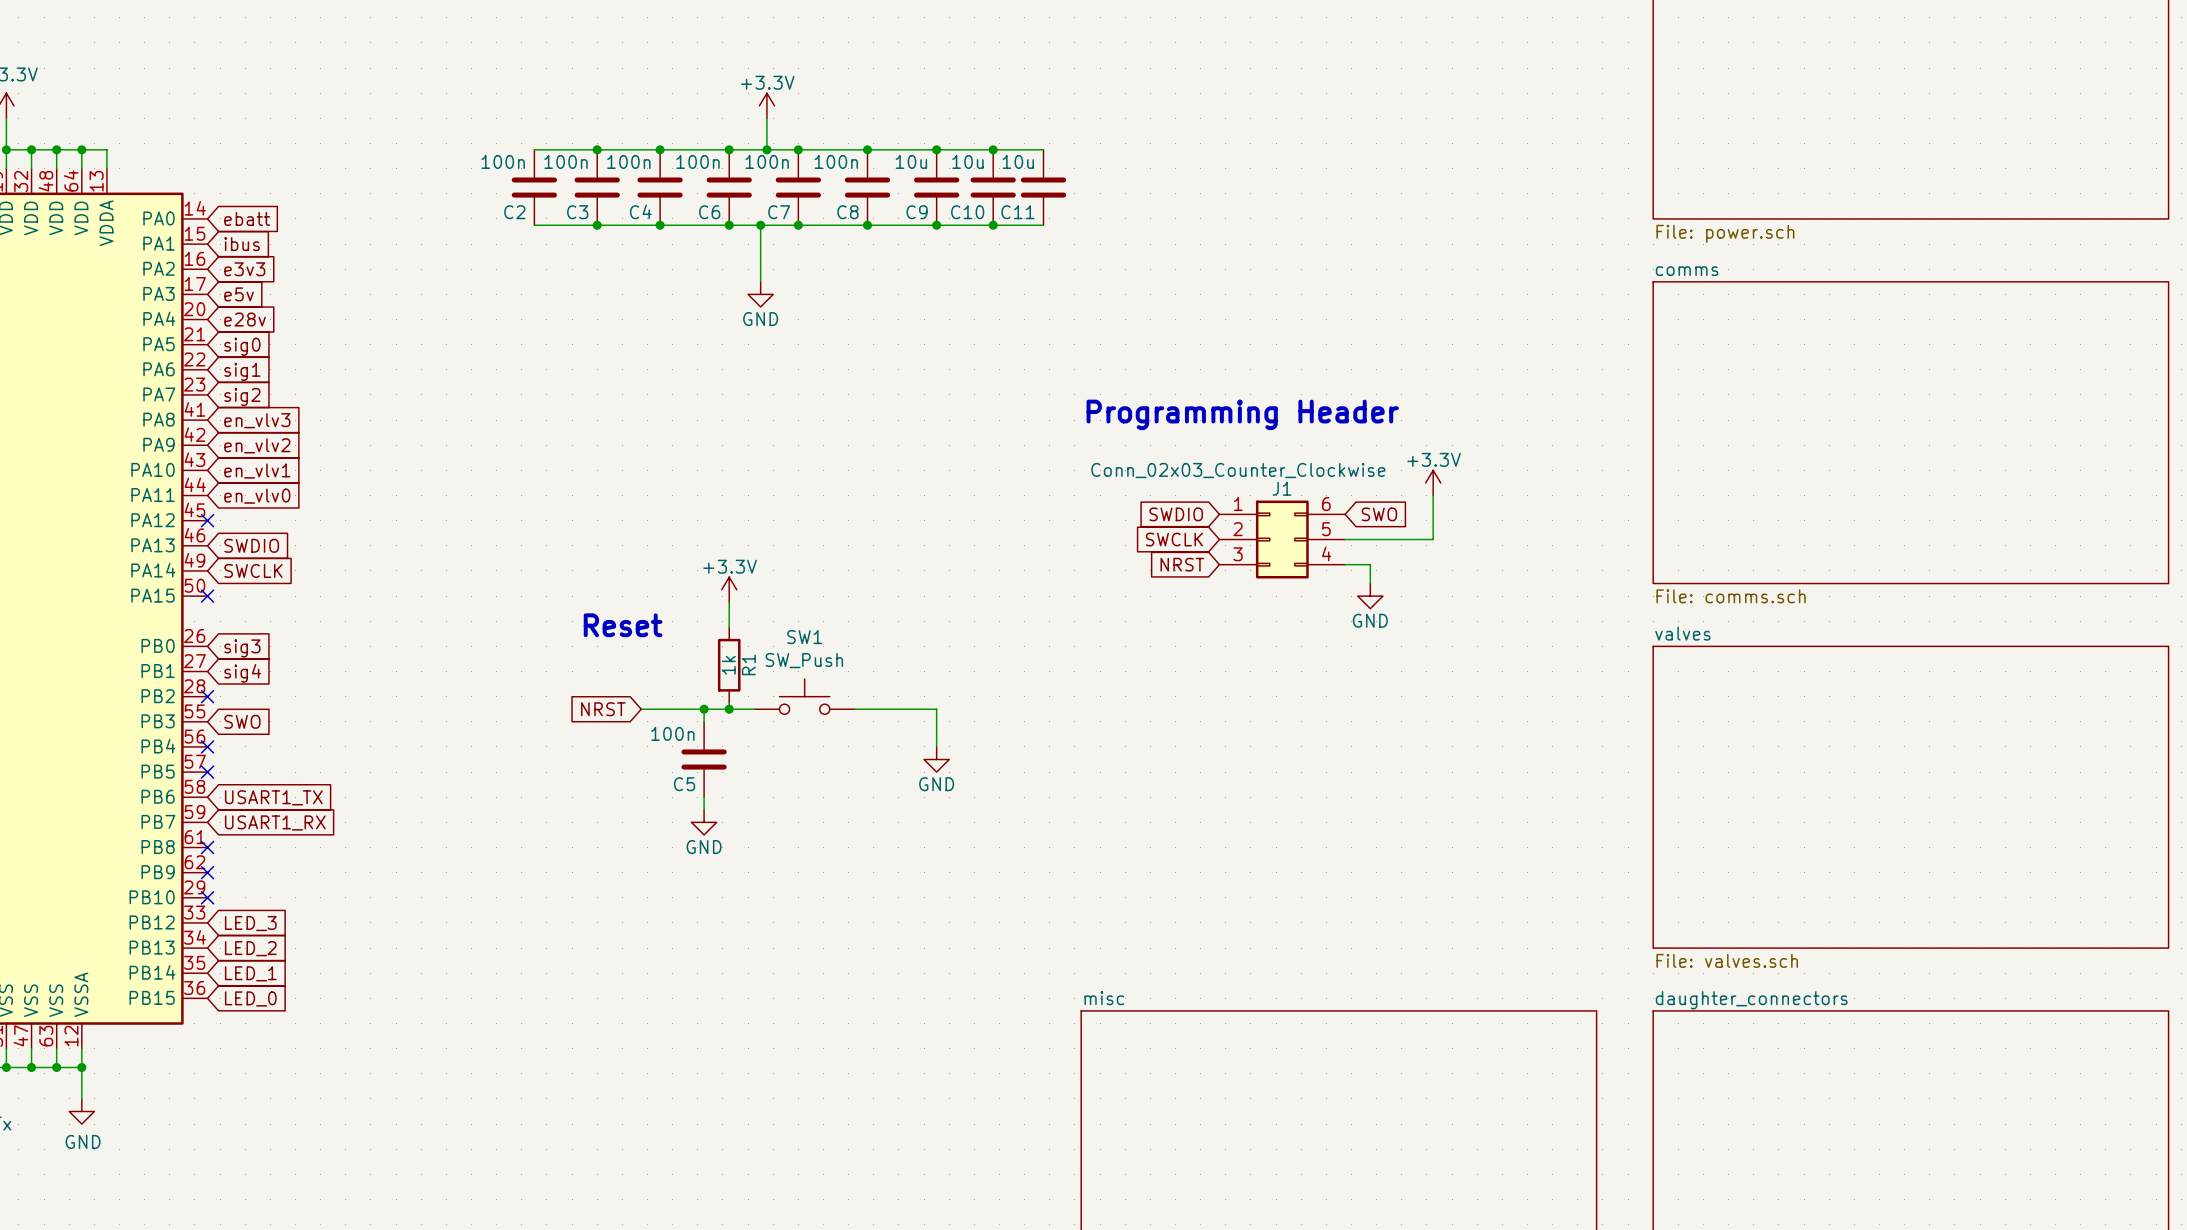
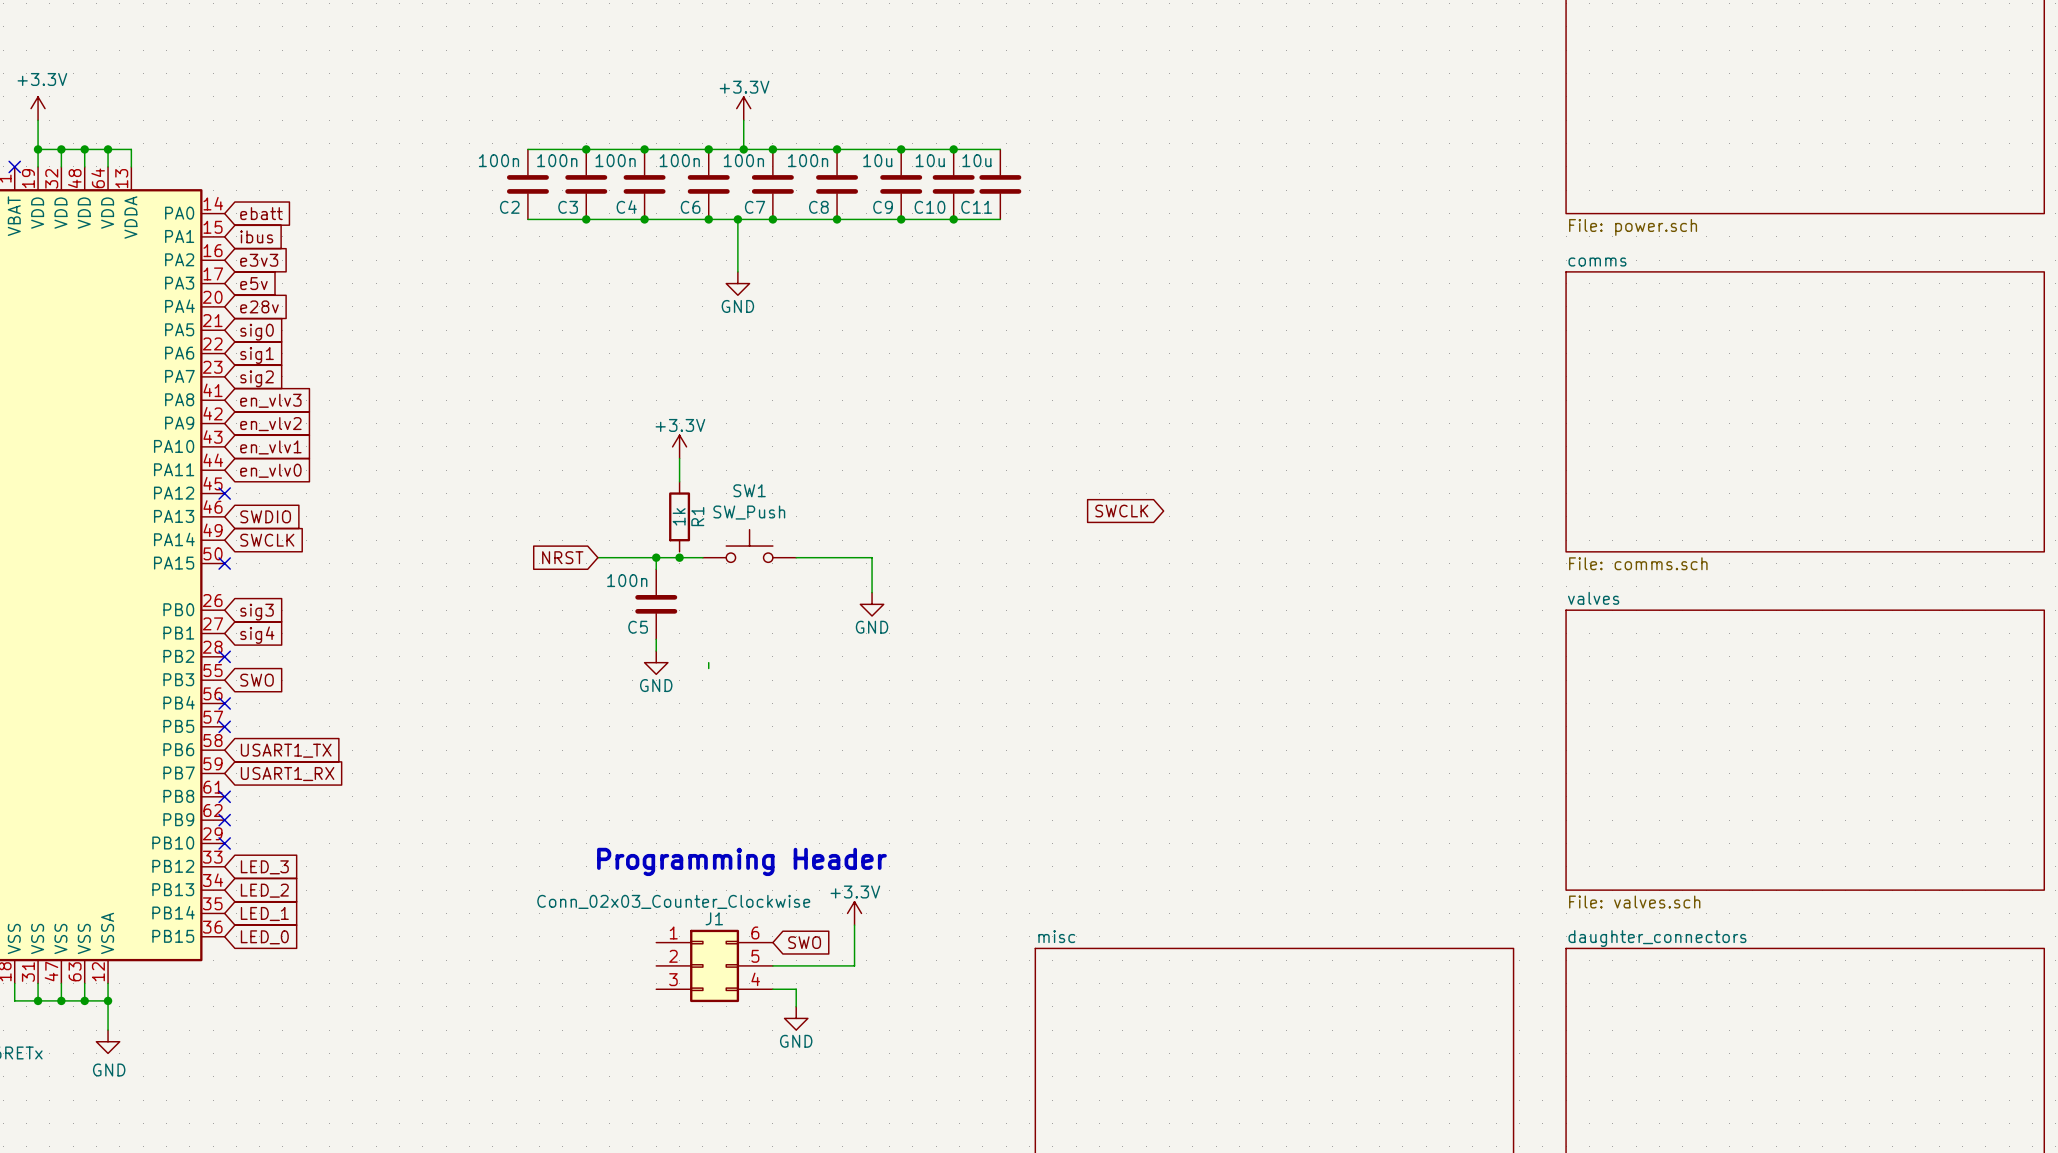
text: Programming Header (1242, 414) -> none
power symbol: +3.3V (1433, 482) -> none
wire: (1433, 495) (1433, 539) (1345, 539) -> none
global label: SWDIO (1176, 514) -> none
global label: SWO (1379, 514) -> none
J1 position: (1282, 539) -> (714, 965)
global label: NRST (1182, 564) -> none
wire: (1345, 564) (1370, 564) (1370, 583) -> none
junction: none -> (656, 557)
junction: none -> (679, 557)
power symbol position: +3.3V (729, 589) -> +3.3V (679, 446)
power symbol: GND (1370, 596) -> none
wire: (729, 602) (729, 627) -> (679, 458) (679, 481)
text: Reset (623, 625) -> none
R1 position: (729, 665) -> (679, 516)
SW1 position: (804, 696) -> (749, 546)
global label position: NRST (603, 709) -> NRST (562, 557)
wire: (641, 709) (754, 709) -> (597, 557) (702, 557)
wire: (704, 709) (704, 721) -> (656, 557) (656, 569)
junction: (704, 709) -> none
junction: (729, 709) -> none
wire: (854, 709) (936, 709) (936, 746) -> (796, 557) (872, 557) (872, 592)
C5 position: (704, 759) -> (656, 604)
power symbol position: GND (936, 759) -> GND (872, 604)
wire: (704, 797) (704, 809) -> (656, 639) (656, 651)
power symbol position: GND (704, 822) -> GND (656, 662)
text: none -> Programming Header (741, 861)
power symbol: none -> +3.3V (854, 913)
wire: none -> (854, 925) (854, 965) (772, 965)
global label: none -> SWO (804, 942)
wire: none -> (772, 989) (796, 989) (796, 1006)
power symbol: none -> GND (796, 1018)

